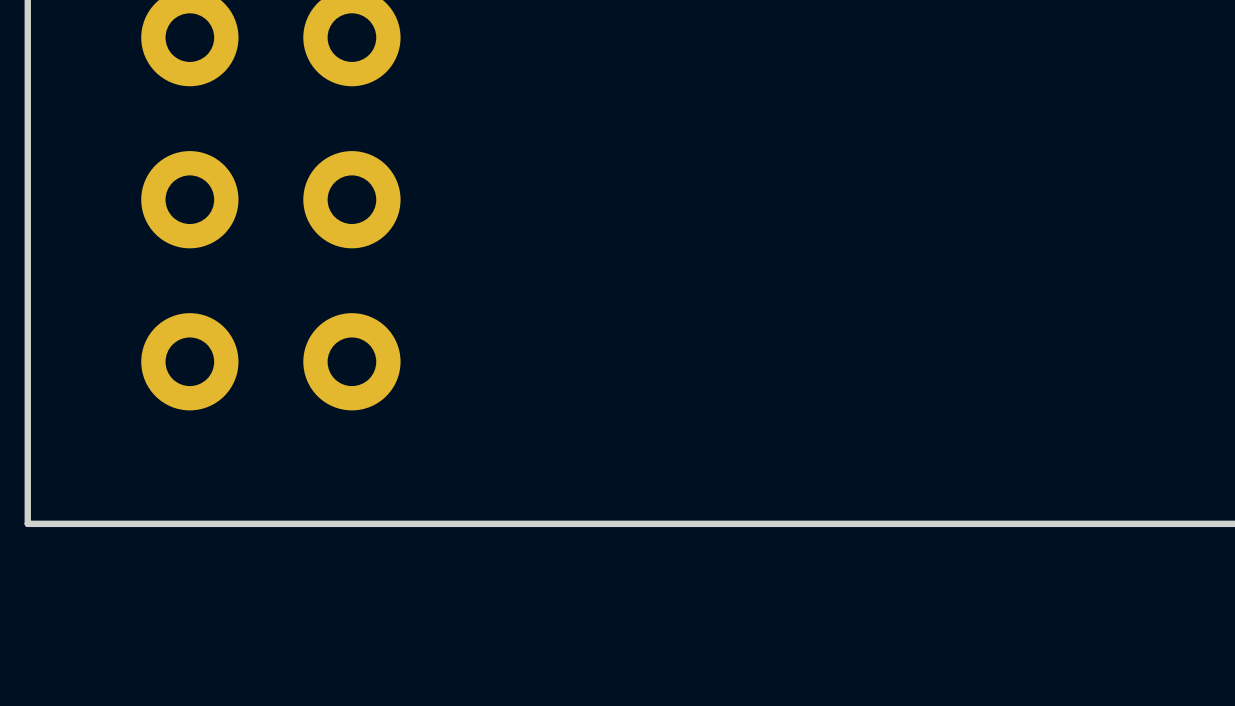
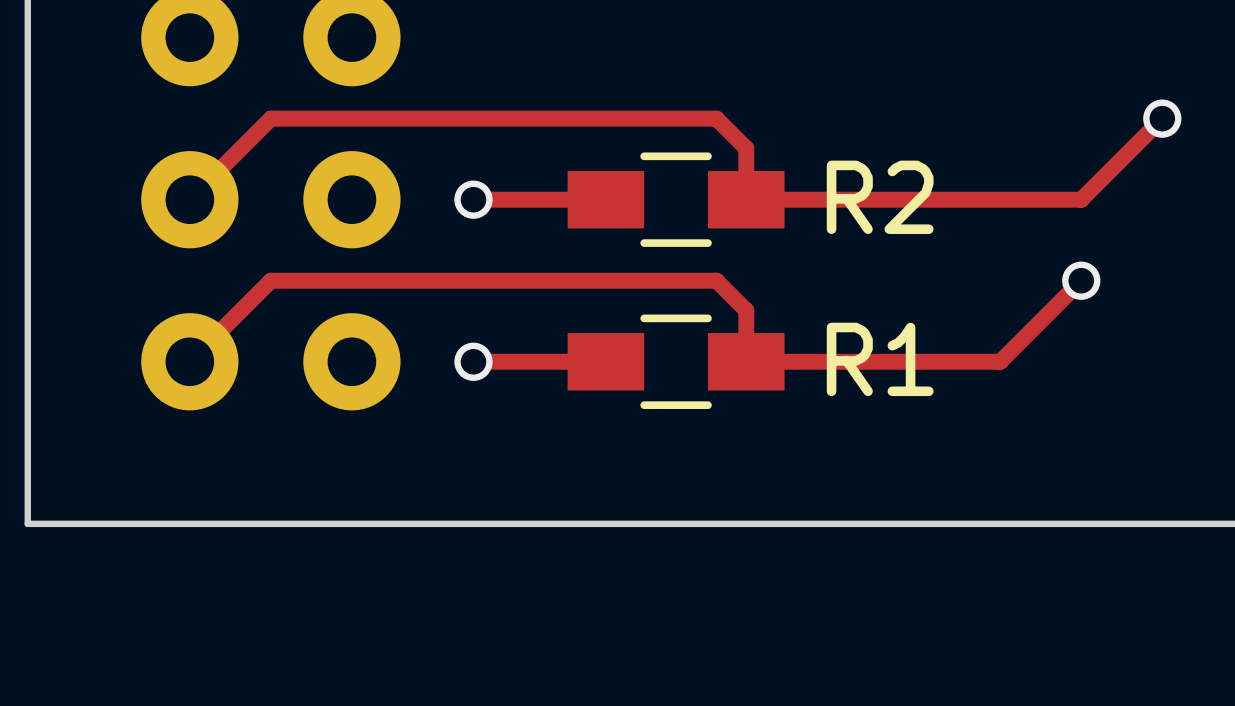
track: none -> (1162, 118) (1081, 199) (746, 199) (746, 148) (716, 118) (270, 118) (189, 199)
via: none -> (1162, 118)
track: none -> (473, 199) (605, 199)
via: none -> (473, 199)
R2: none -> (676, 199)
track: none -> (1081, 280) (1000, 361) (746, 361) (746, 310) (716, 280) (270, 280) (189, 361)
via: none -> (1081, 280)
track: none -> (473, 361) (605, 361)
via: none -> (473, 361)
R1: none -> (676, 361)

